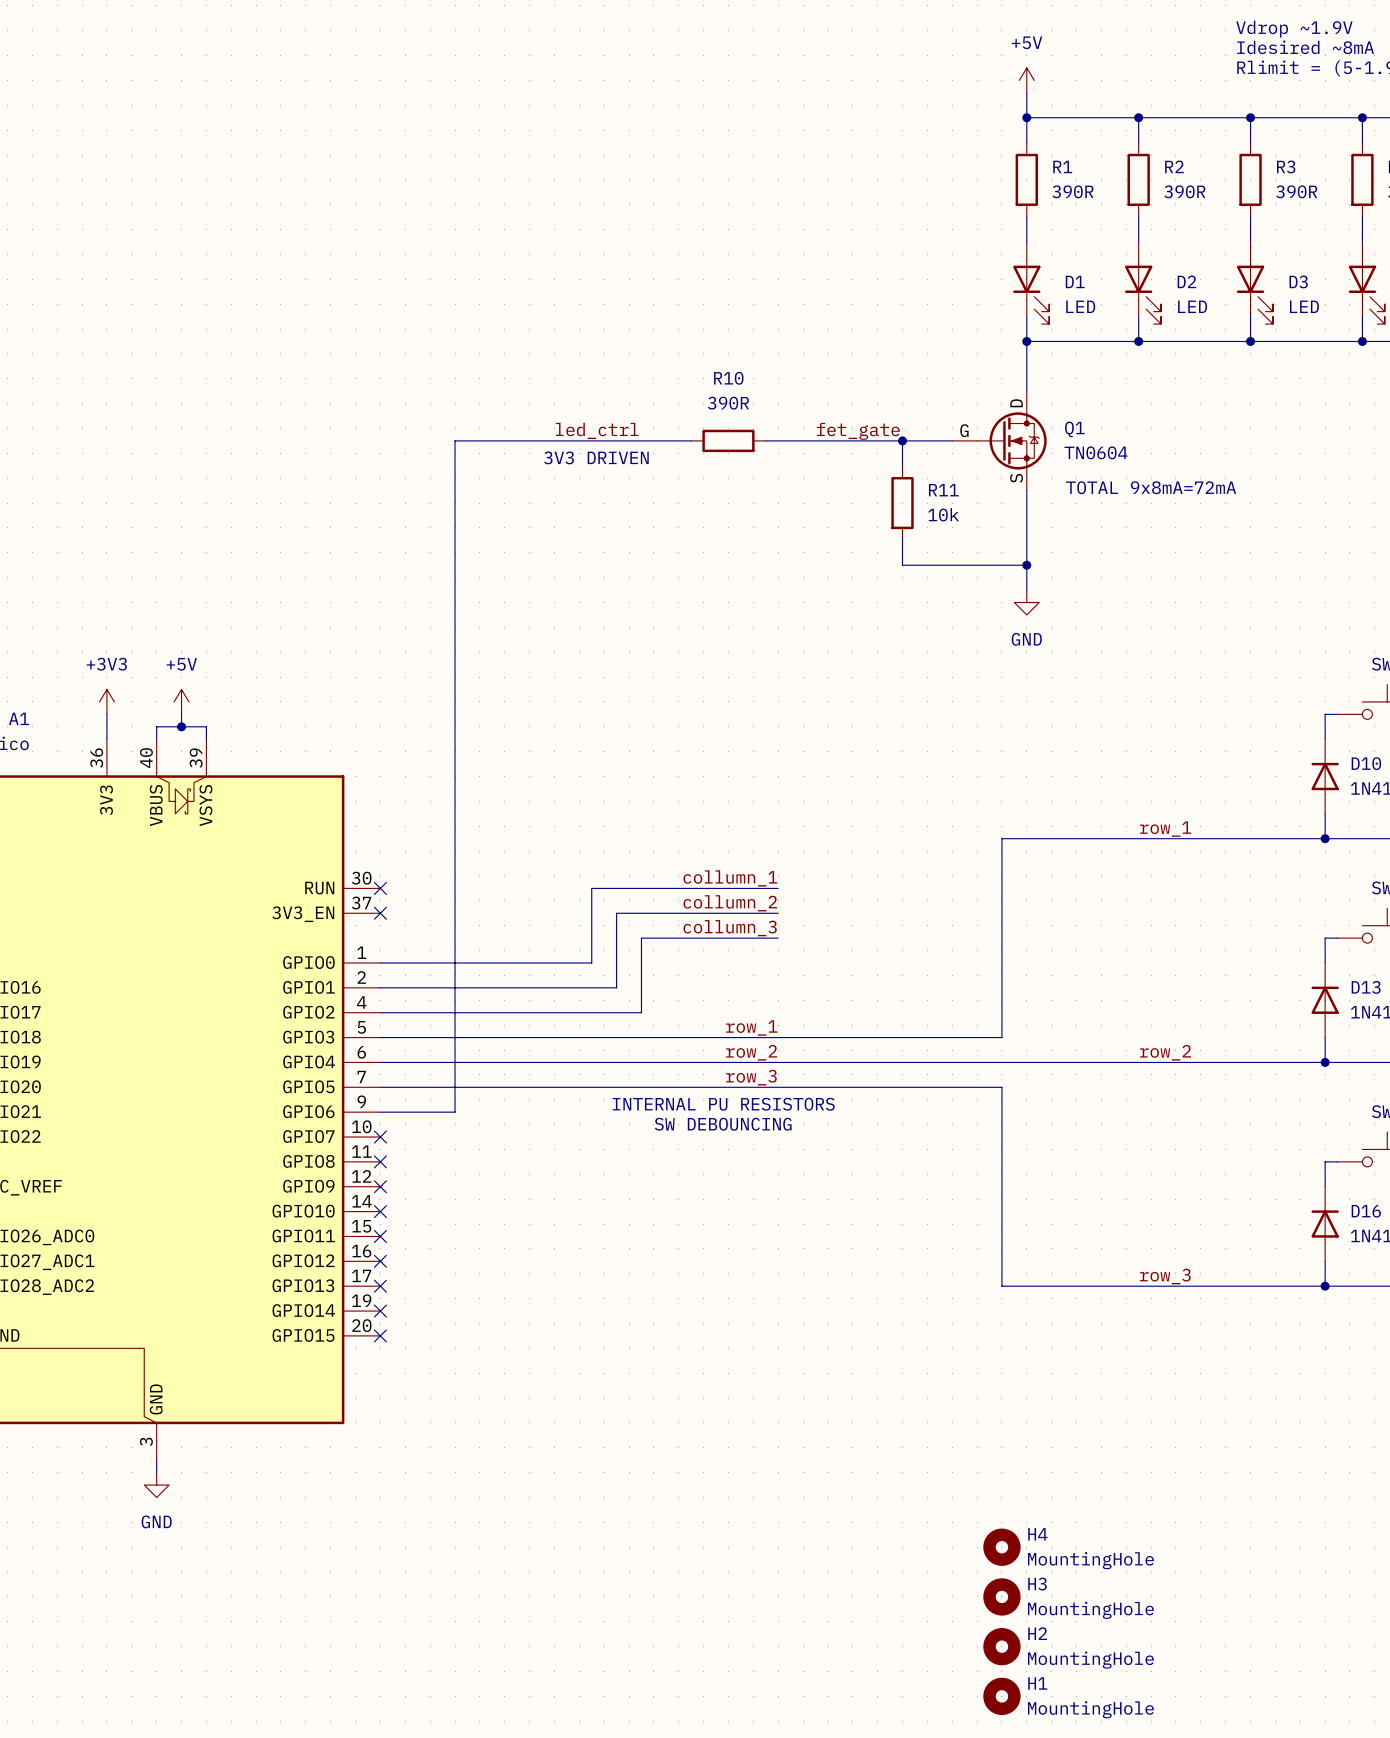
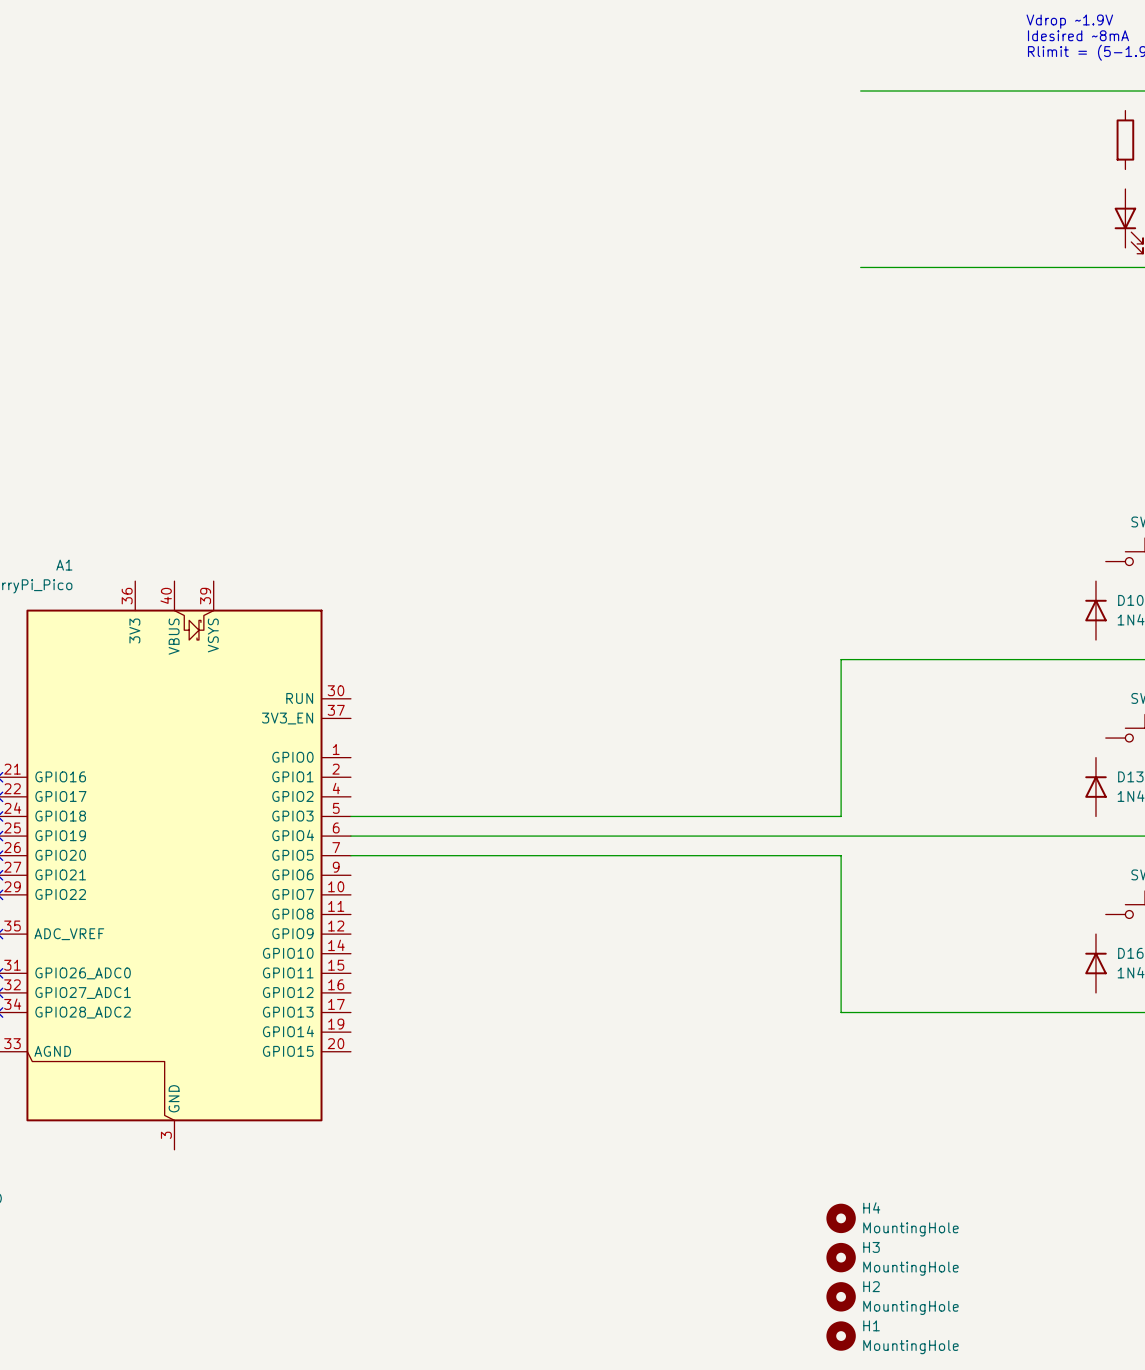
power symbol: +5V (1026, 80) -> none
wire: (1026, 92) (1026, 142) -> none
junction: (1026, 117) -> none
wire: (1138, 117) (1138, 142) -> none
junction: (1138, 117) -> none
wire: (1250, 117) (1250, 142) -> none
junction: (1250, 117) -> none
wire: (1362, 117) (1362, 142) -> none
junction: (1362, 117) -> none
R1: 390R (1026, 179) -> none
R2: 390R (1138, 179) -> none
R3: 390R (1250, 179) -> none
wire: (1026, 217) (1026, 242) -> none
wire: (1138, 217) (1138, 242) -> none
wire: (1250, 217) (1250, 242) -> none
wire: (1362, 217) (1362, 242) -> none
D1: LED (1031, 283) -> none
D2: LED (1143, 283) -> none
D3: LED (1254, 283) -> none
wire: (1026, 316) (1026, 391) -> none
wire: (1138, 316) (1138, 341) -> none
wire: (1250, 316) (1250, 341) -> none
wire: (1362, 316) (1362, 341) -> none
junction: (1026, 341) -> none
junction: (1138, 341) -> none
junction: (1250, 341) -> none
junction: (1362, 341) -> none
label: led_ctrl (597, 430) -> none
label: fet_gate (858, 431) -> none
wire: (691, 440) (455, 440) (455, 1112) (380, 1112) -> none
R10: 390R (728, 440) -> none
wire: (765, 440) (952, 440) -> none
wire: (902, 440) (902, 465) -> none
junction: (902, 440) -> none
Q1: TN0604 (999, 440) -> none
text: 3V3 DRIVEN (596, 457) -> none
text: TOTAL 9x8mA=72mA (1151, 487) -> none
wire: (1026, 490) (1026, 590) -> none
R11: 10k (902, 503) -> none
wire: (902, 540) (902, 565) (1026, 565) -> none
junction: (1026, 565) -> none
power symbol: GND (1026, 602) -> none
power symbol: +3V3 (106, 701) -> none
power symbol: +5V (181, 701) -> none
wire: (106, 714) (106, 739) -> none
wire: (181, 714) (181, 726) -> none
wire: (1337, 714) (1325, 714) (1325, 739) -> none
junction: (181, 726) -> none
wire: (156, 739) (156, 726) (206, 726) (206, 739) -> none
wire: (1325, 813) (1325, 838) -> none
label: row_1 (1165, 829) -> none
junction: (1325, 838) -> none
label: collumn_1 (730, 878) -> none
no-connect mark: (380, 888) -> none
wire: (778, 888) (591, 888) (591, 962) (380, 962) -> none
label: collumn_2 (730, 903) -> none
no-connect mark: (380, 913) -> none
wire: (778, 913) (616, 913) (616, 987) (380, 987) -> none
label: collumn_3 (730, 928) -> none
wire: (778, 938) (641, 938) (641, 1012) (380, 1012) -> none
wire: (1337, 938) (1325, 938) (1325, 962) -> none
label: row_1 (751, 1027) -> none
wire: (1325, 1037) (1325, 1062) -> none
label: row_2 (751, 1052) -> none
label: row_2 (1165, 1052) -> none
junction: (1325, 1062) -> none
label: row_3 (751, 1077) -> none
text: INTERNAL PU RESISTORS (723, 1104) -> none
text: SW DEBOUNCING (723, 1124) -> none
no-connect mark: (380, 1137) -> none
no-connect mark: (380, 1161) -> none
wire: (1337, 1161) (1325, 1161) (1325, 1186) -> none
no-connect mark: (380, 1186) -> none
no-connect mark: (380, 1211) -> none
no-connect mark: (380, 1236) -> none
no-connect mark: (380, 1261) -> none
wire: (1325, 1261) (1325, 1286) -> none
label: row_3 (1165, 1276) -> none
no-connect mark: (380, 1286) -> none
junction: (1325, 1286) -> none
no-connect mark: (380, 1311) -> none
no-connect mark: (380, 1335) -> none
wire: (156, 1460) (156, 1472) -> none
power symbol: GND (156, 1485) -> none

